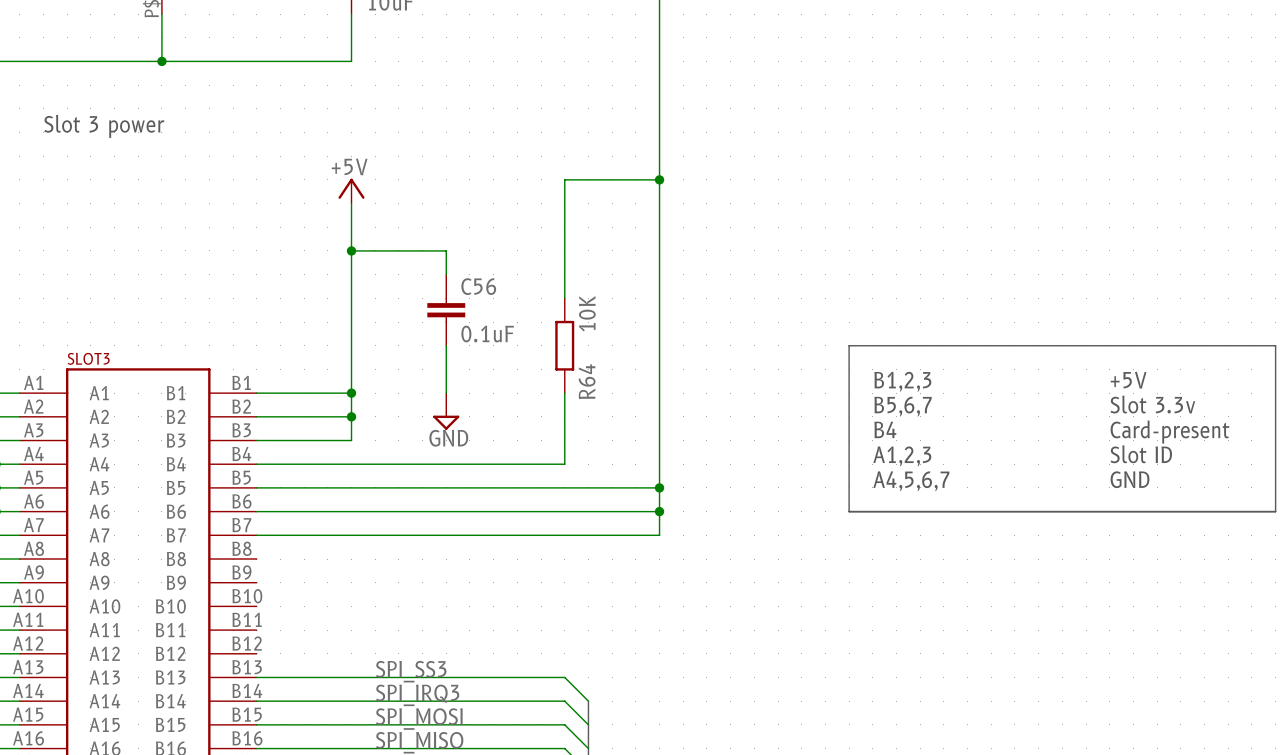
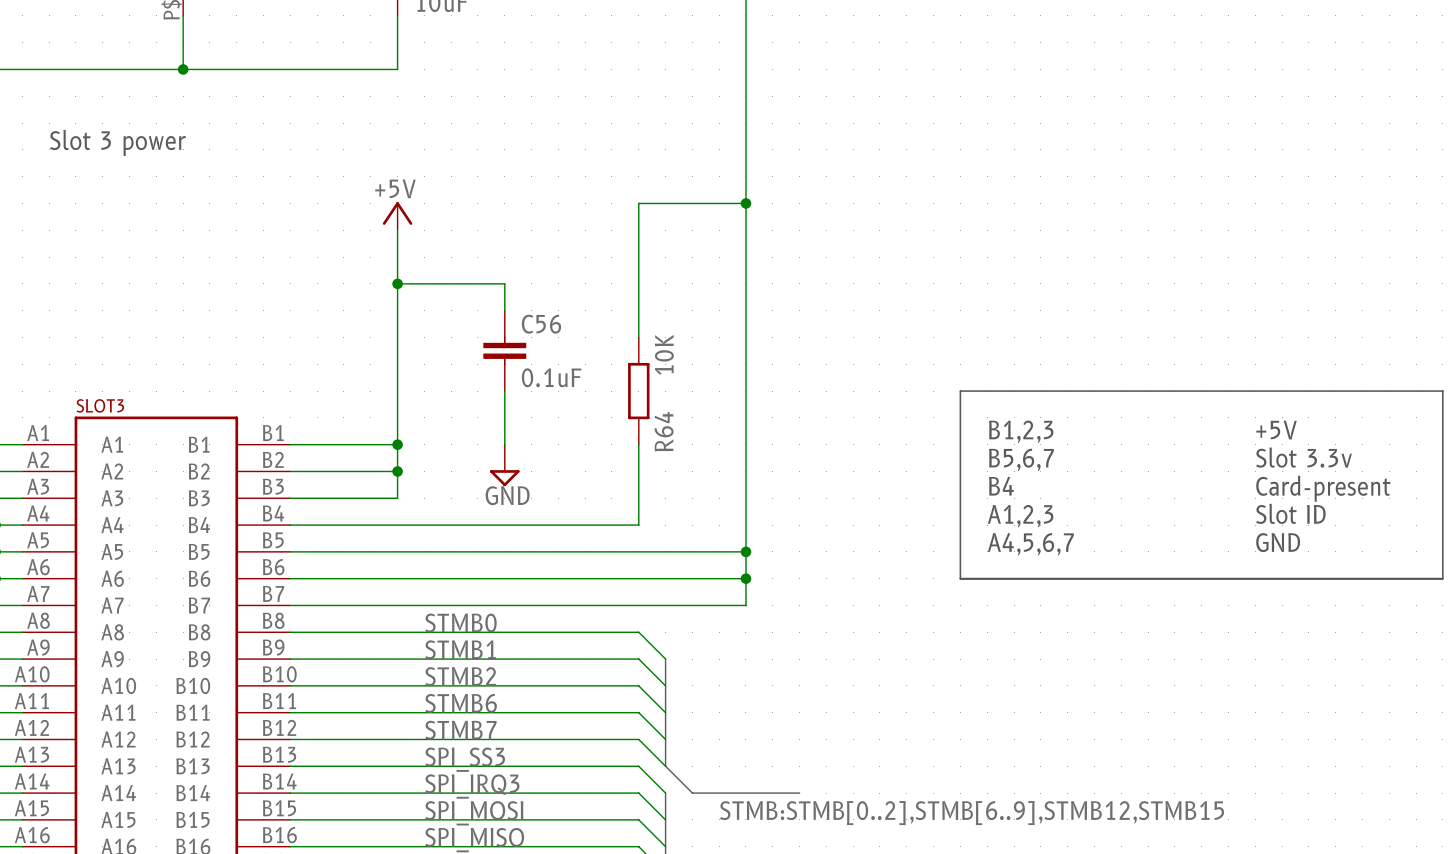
label: none -> STMB0 (460, 623)
wire: none -> (290, 632) (638, 632) (665, 659)
label: none -> STMB1 (460, 649)
wire: none -> (290, 659) (638, 659) (665, 685)
bus: none -> (665, 659) (665, 766) (692, 793) (799, 793)
label: none -> STMB2 (460, 676)
wire: none -> (290, 685) (638, 685) (665, 712)
label: none -> STMB6 (461, 703)
wire: none -> (290, 712) (638, 712) (665, 739)
label: none -> STMB7 (460, 730)
wire: none -> (290, 739) (638, 739) (665, 766)
label: none -> STMB:STMB[0..2],STMB[6..9],STMB12,STMB15 (972, 813)

